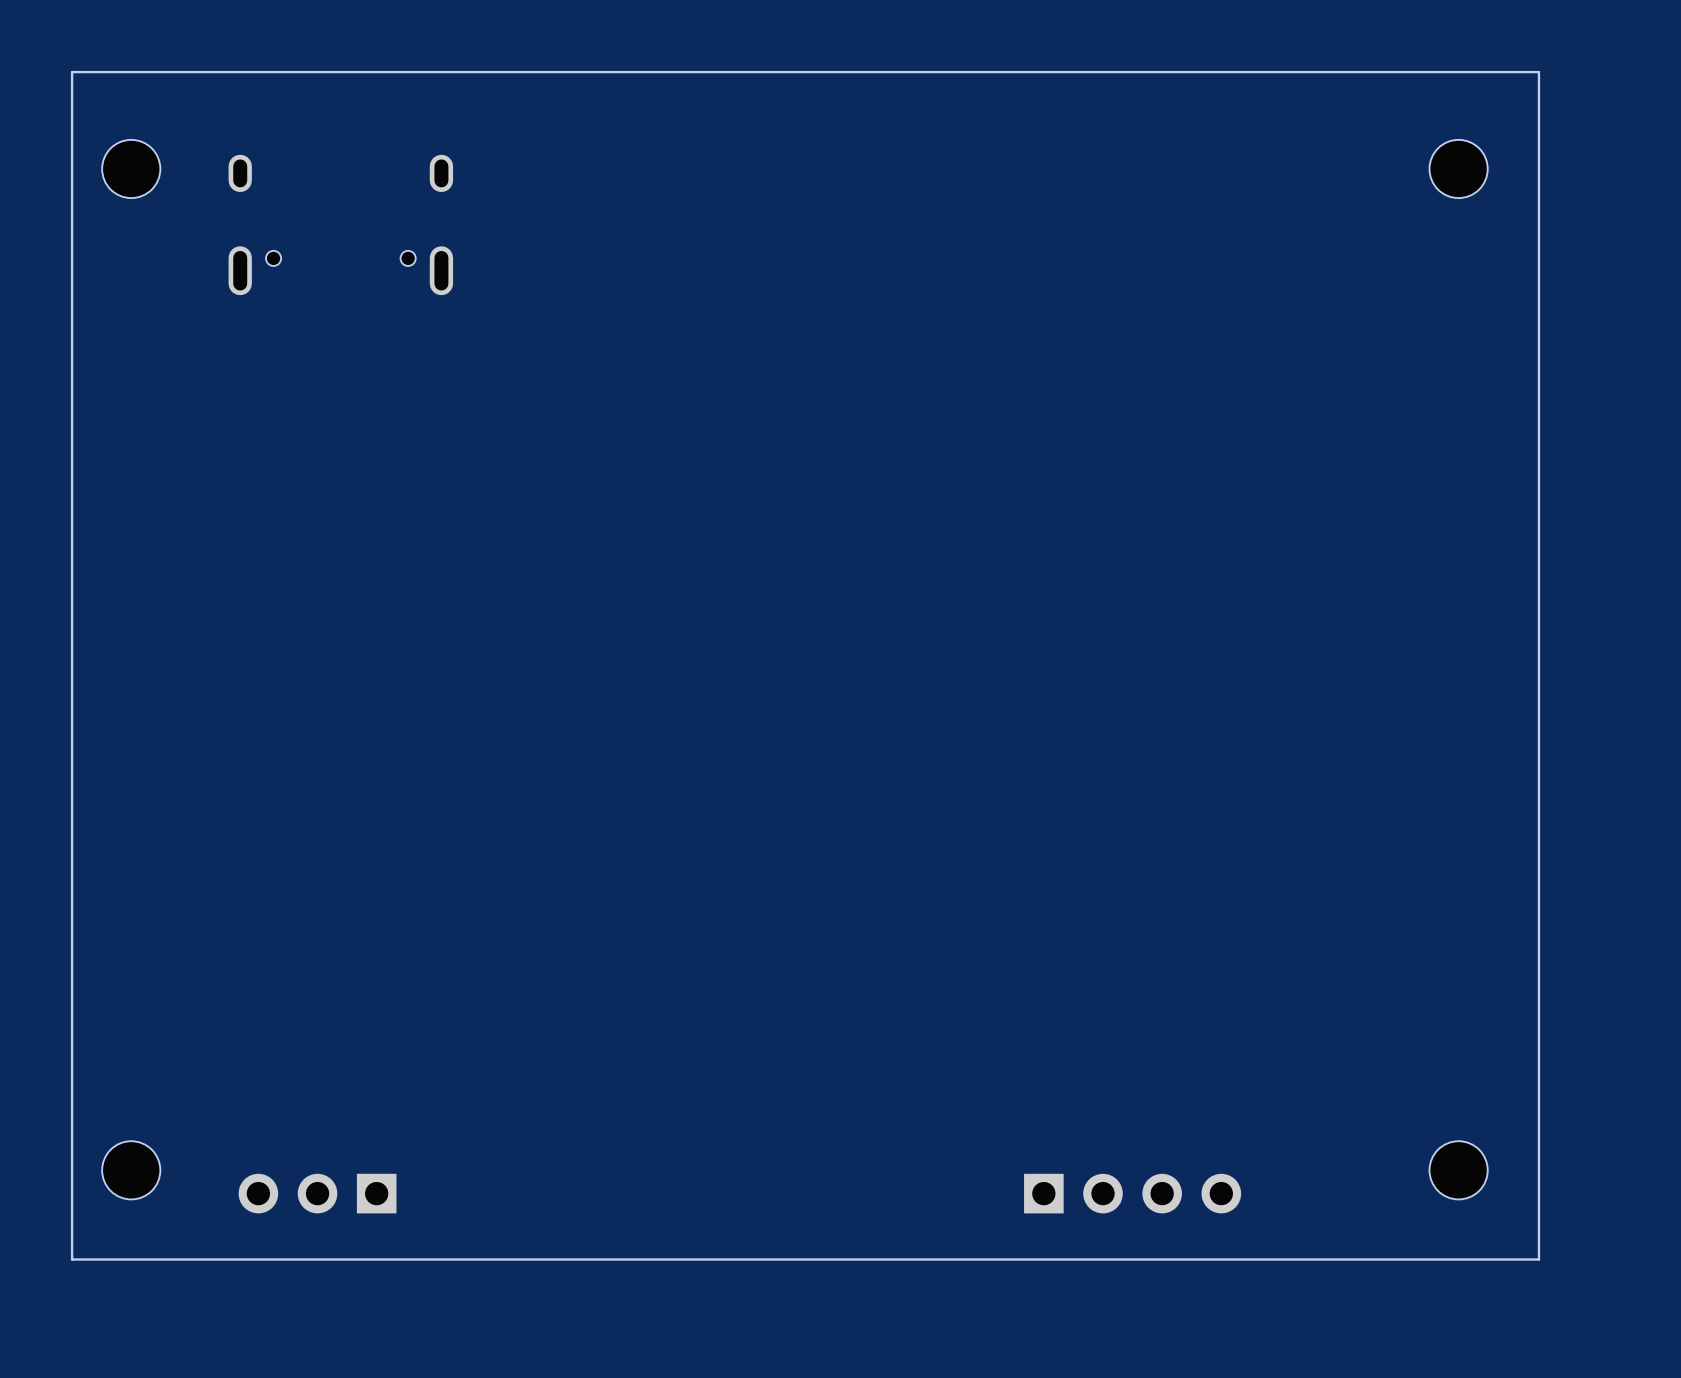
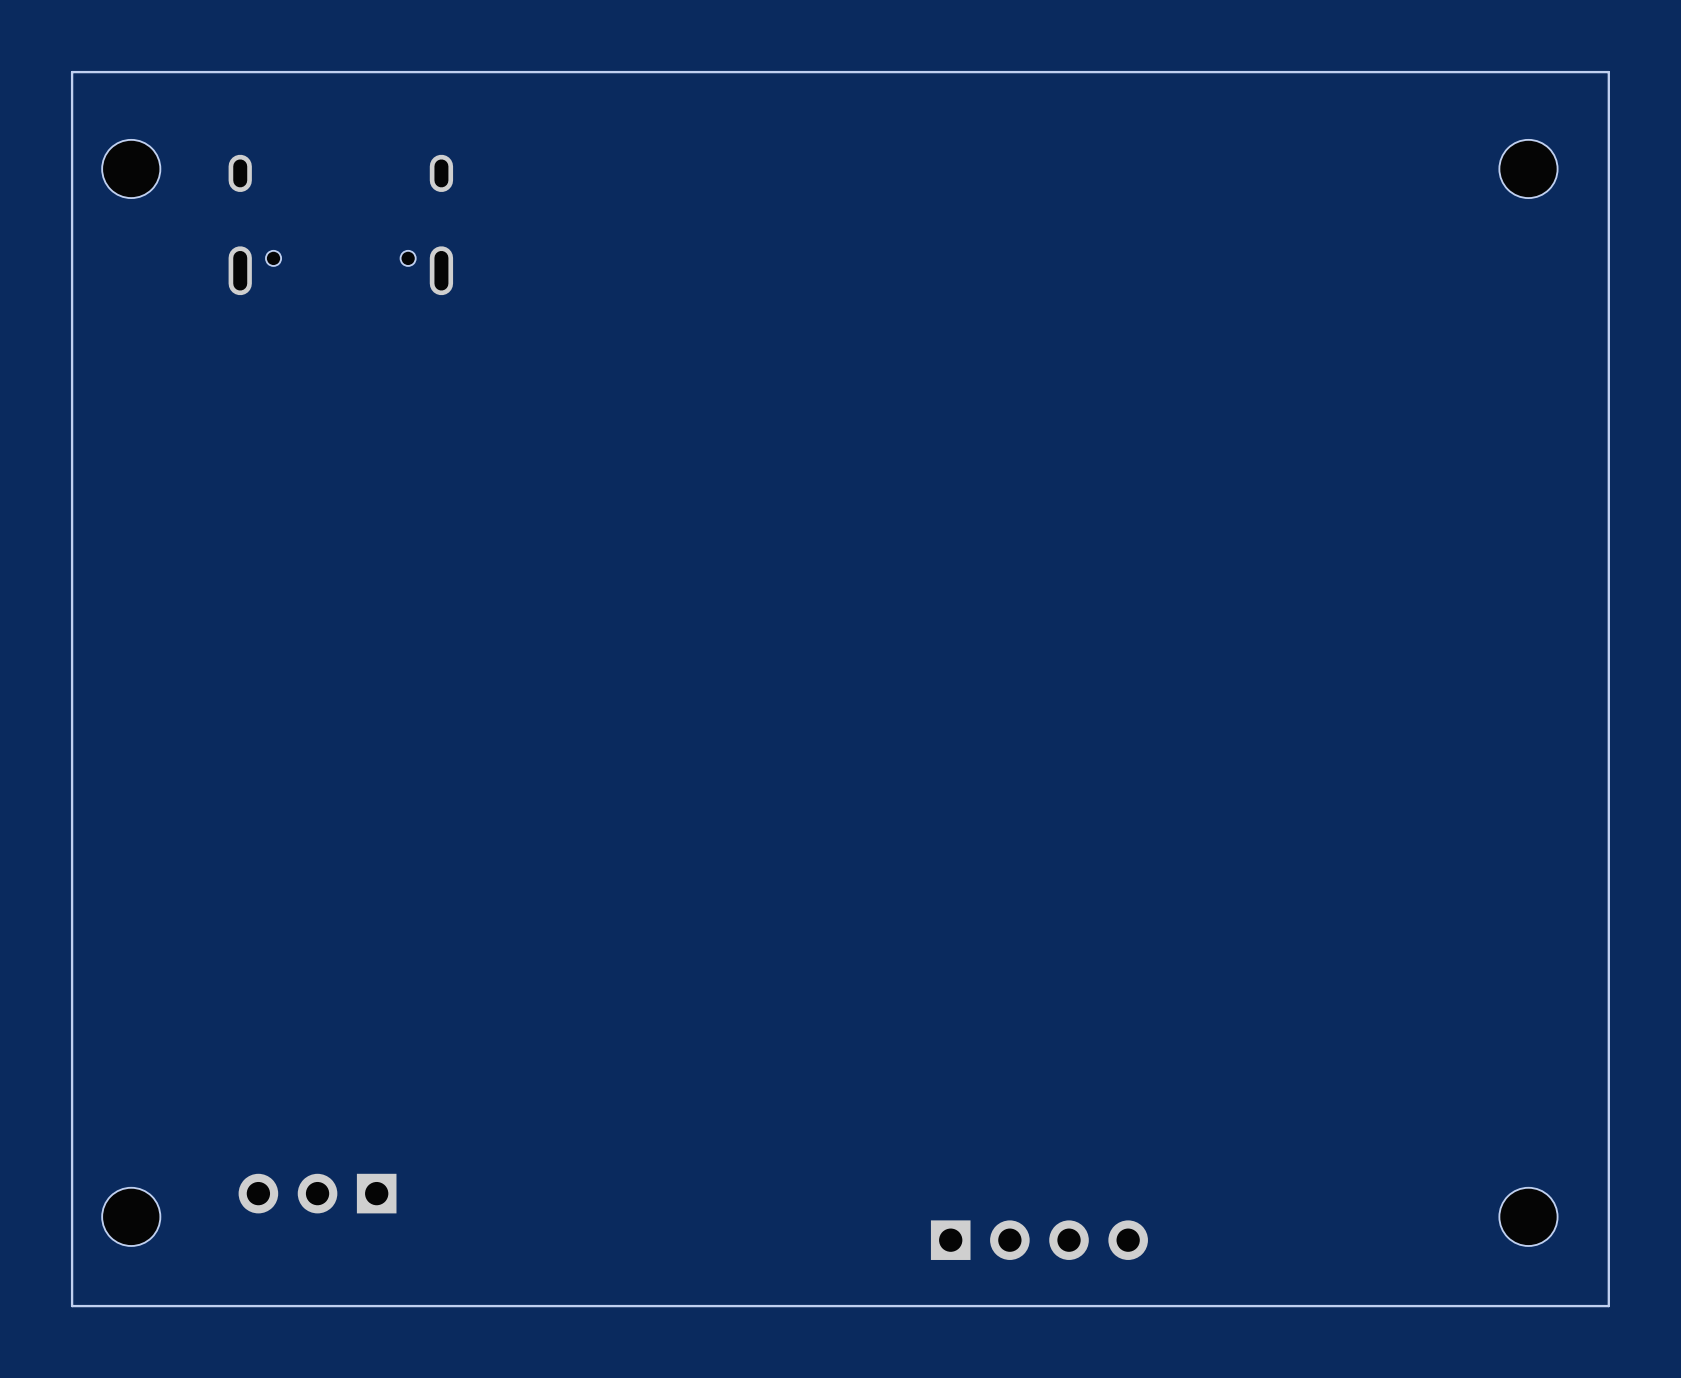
board edge: (1538, 72) (1538, 1259) (72, 1259) -> (1538, 72) (1608, 72) (1608, 1306) (72, 1306) (72, 1259)
part position: (1458, 168) -> (1528, 168)
part position: (131, 1170) -> (131, 1216)
part position: (1458, 1170) -> (1528, 1216)
part position: (1132, 1193) -> (1039, 1240)

